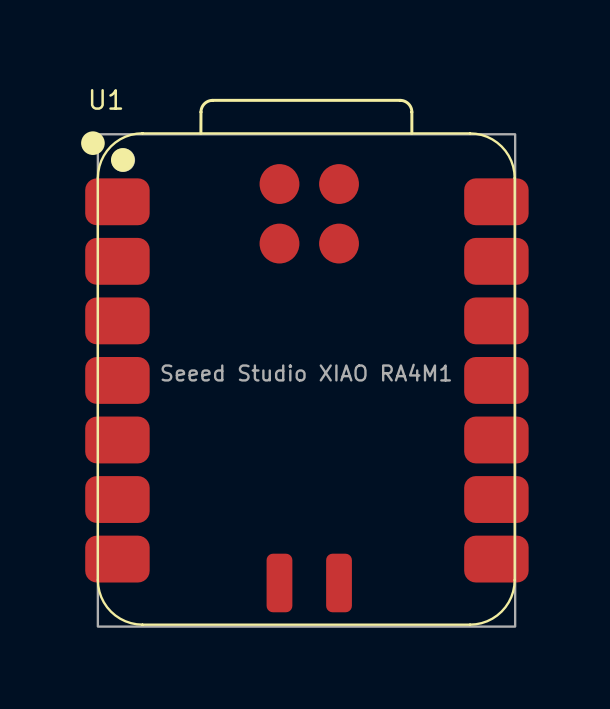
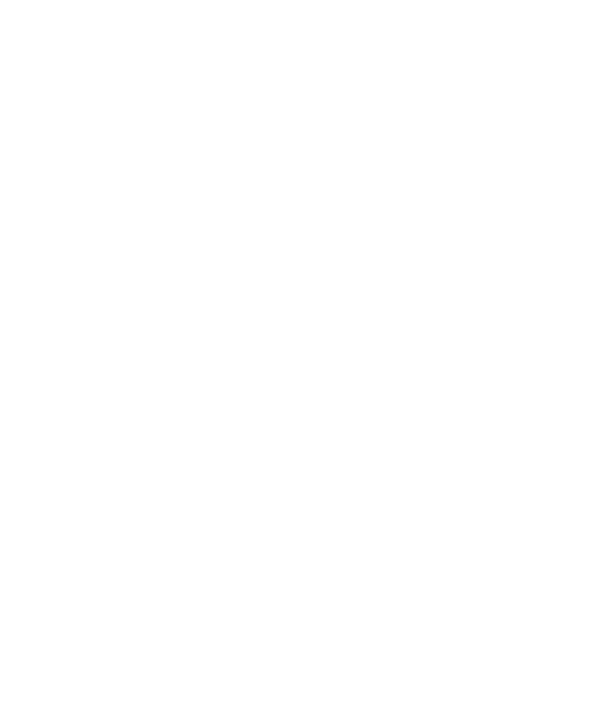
U1: Seeed Studio XIAO RA4M1 (304, 363) -> none

